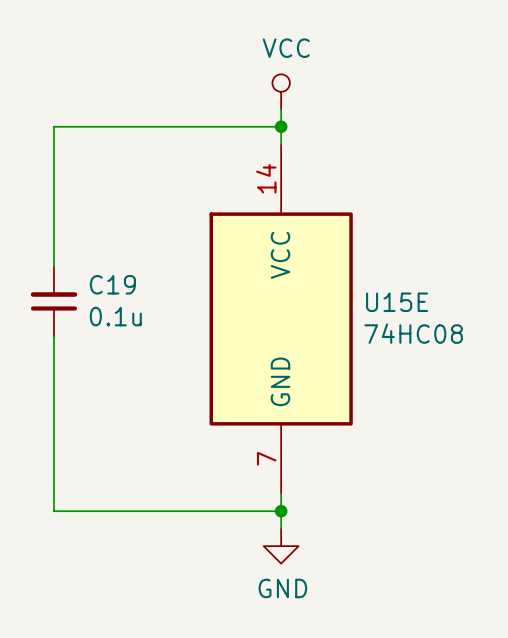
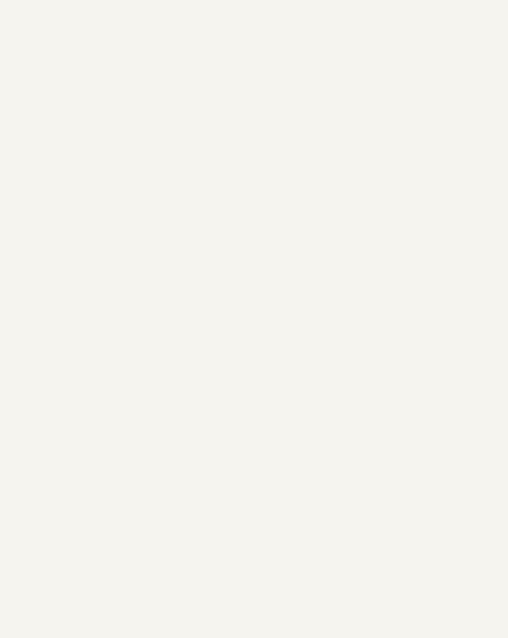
power symbol: VCC (281, 91) -> none
wire: (281, 109) (281, 144) -> none
wire: (281, 126) (53, 126) (53, 266) -> none
junction: (281, 126) -> none
C19: 0.1u (53, 301) -> none
U15E: 74HC08 (281, 318) -> none
wire: (53, 336) (53, 511) (281, 511) -> none
wire: (281, 493) (281, 528) -> none
junction: (281, 511) -> none
power symbol: GND (281, 546) -> none

